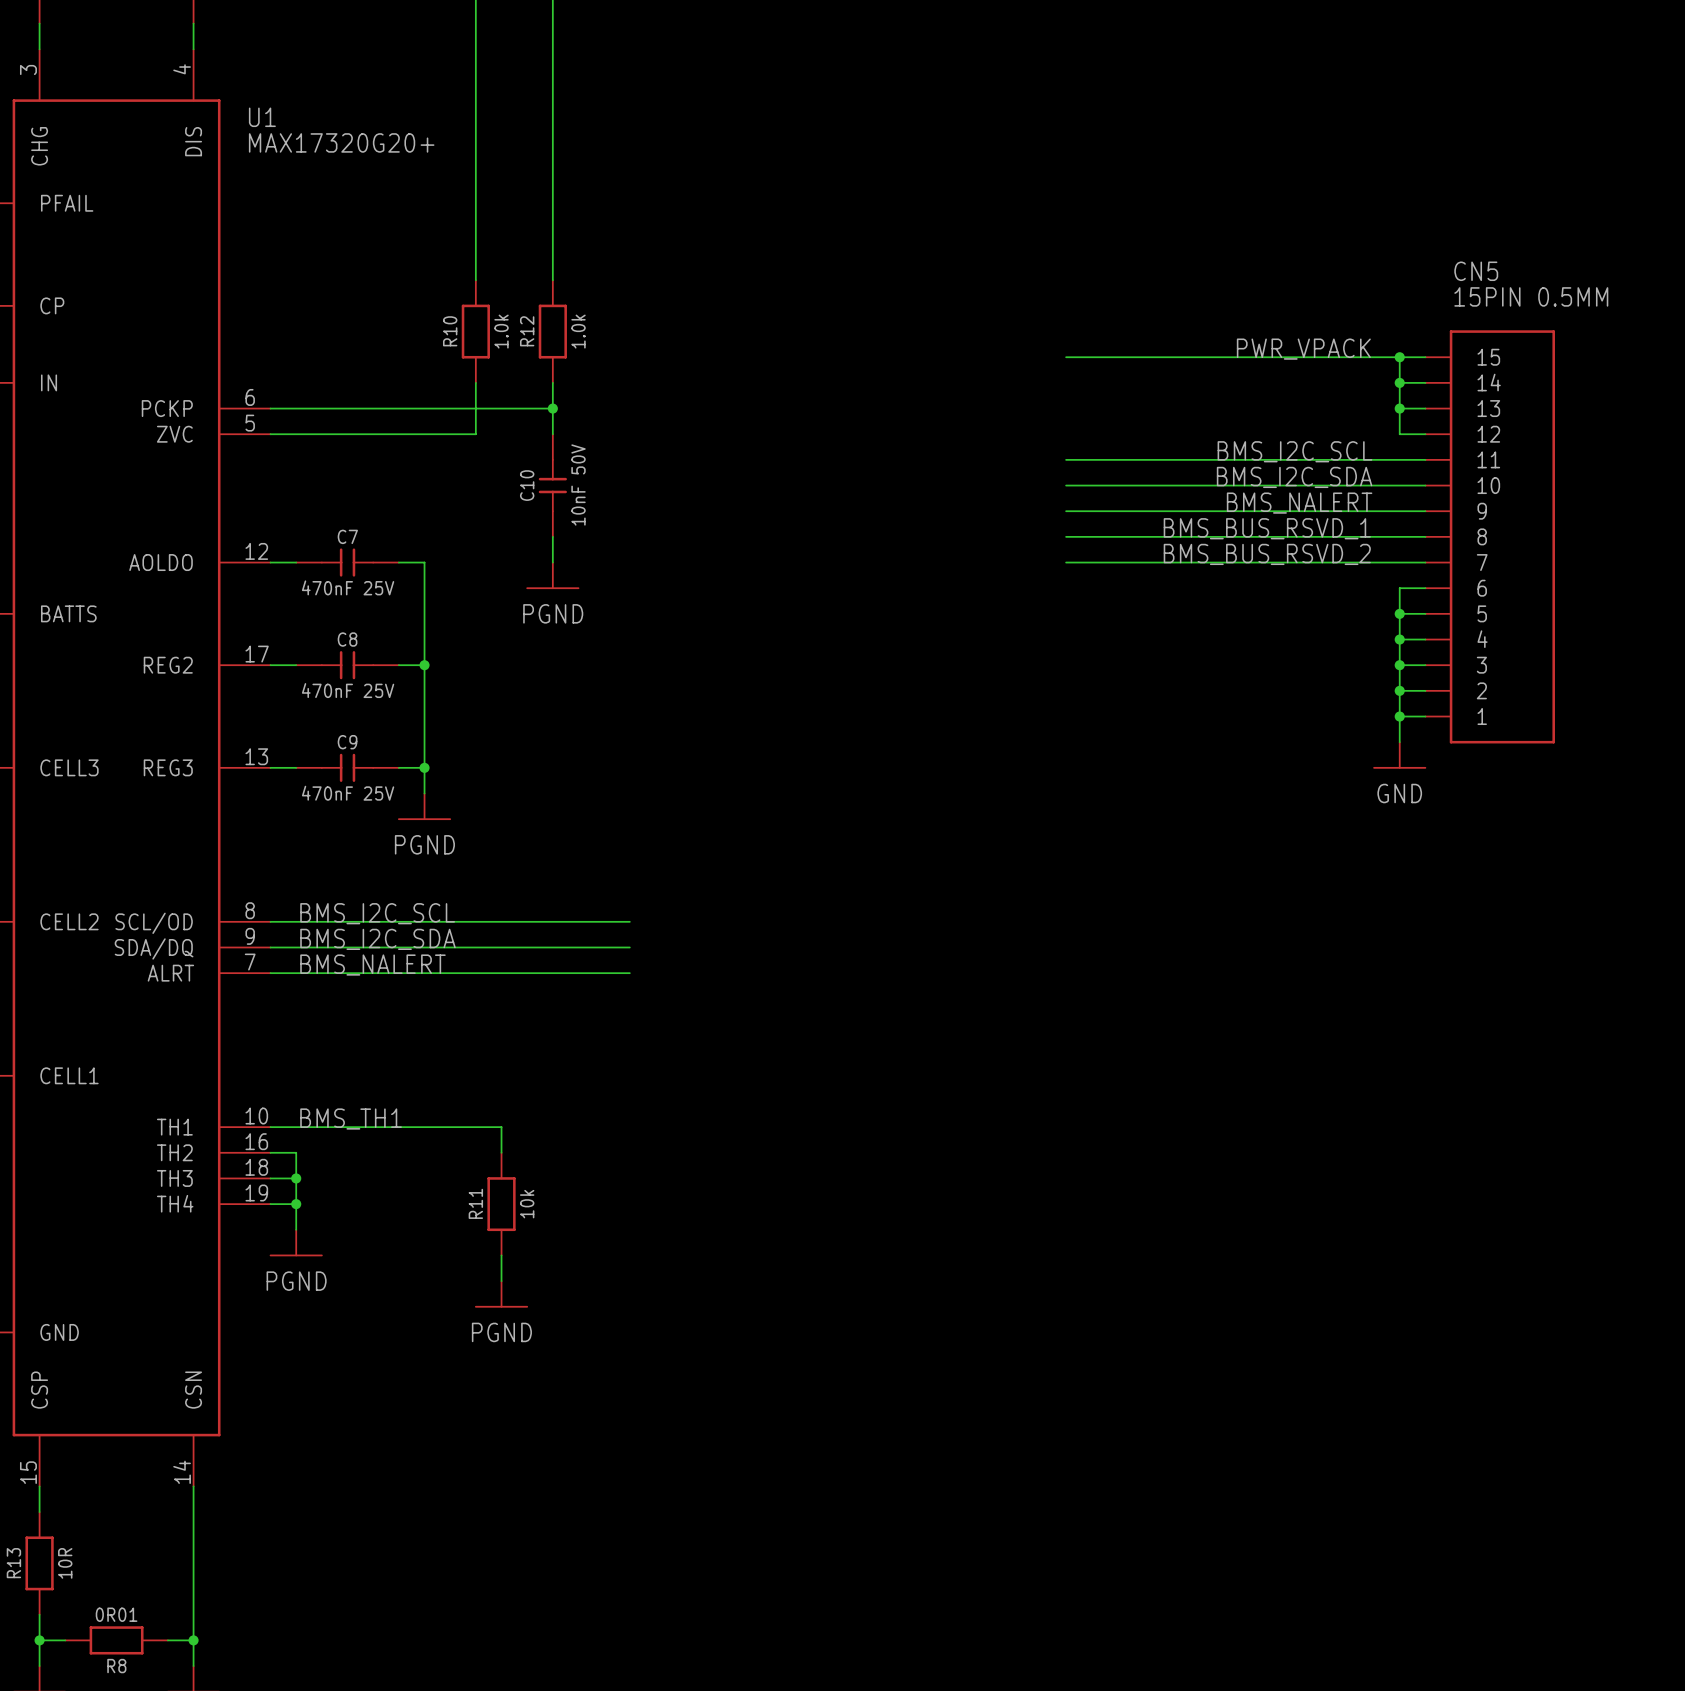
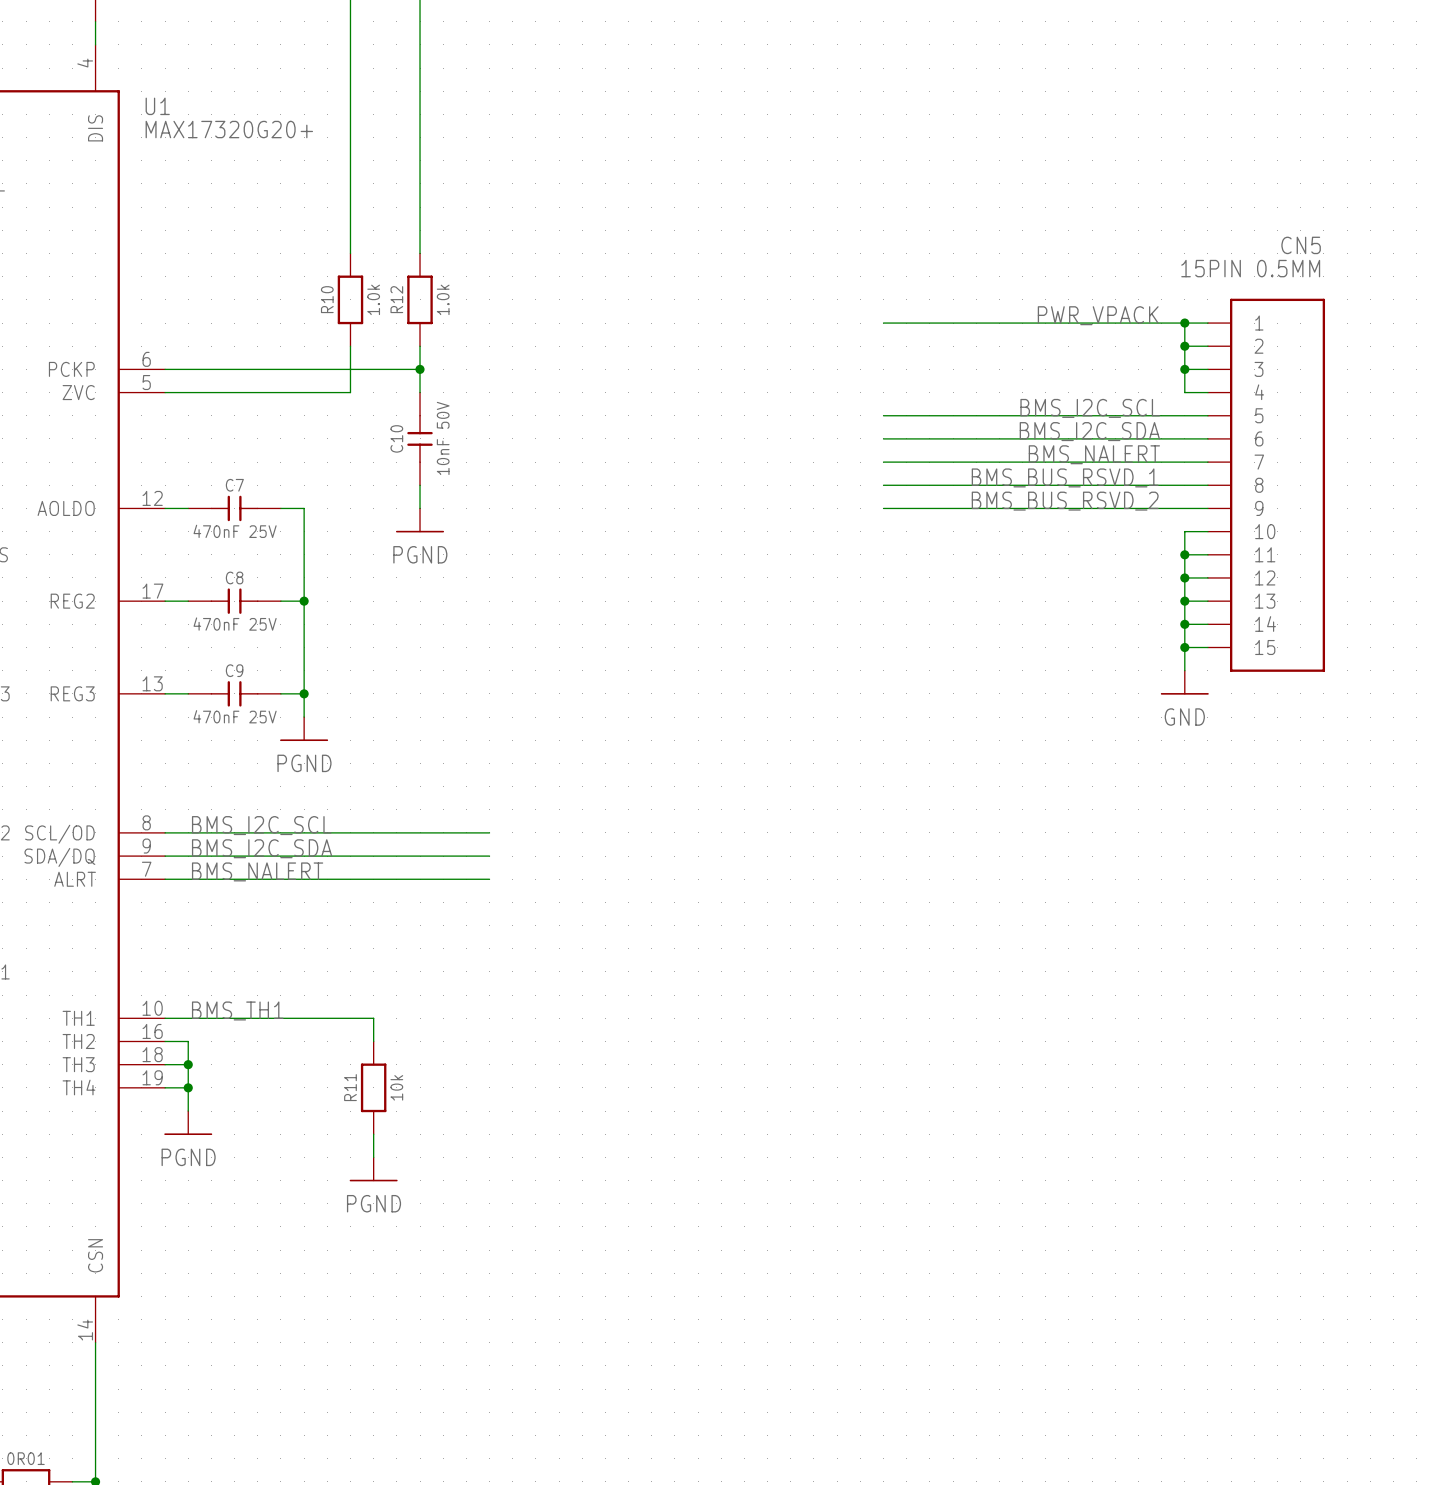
CN5 name position: CN5 (1476, 271) -> CN5 (1301, 245)
CN5 value position: 15PIN 0.5MM (1531, 296) -> 15PIN 0.5MM (1250, 268)
CN5 flip: as is (1502, 536) -> up-down (1277, 485)

